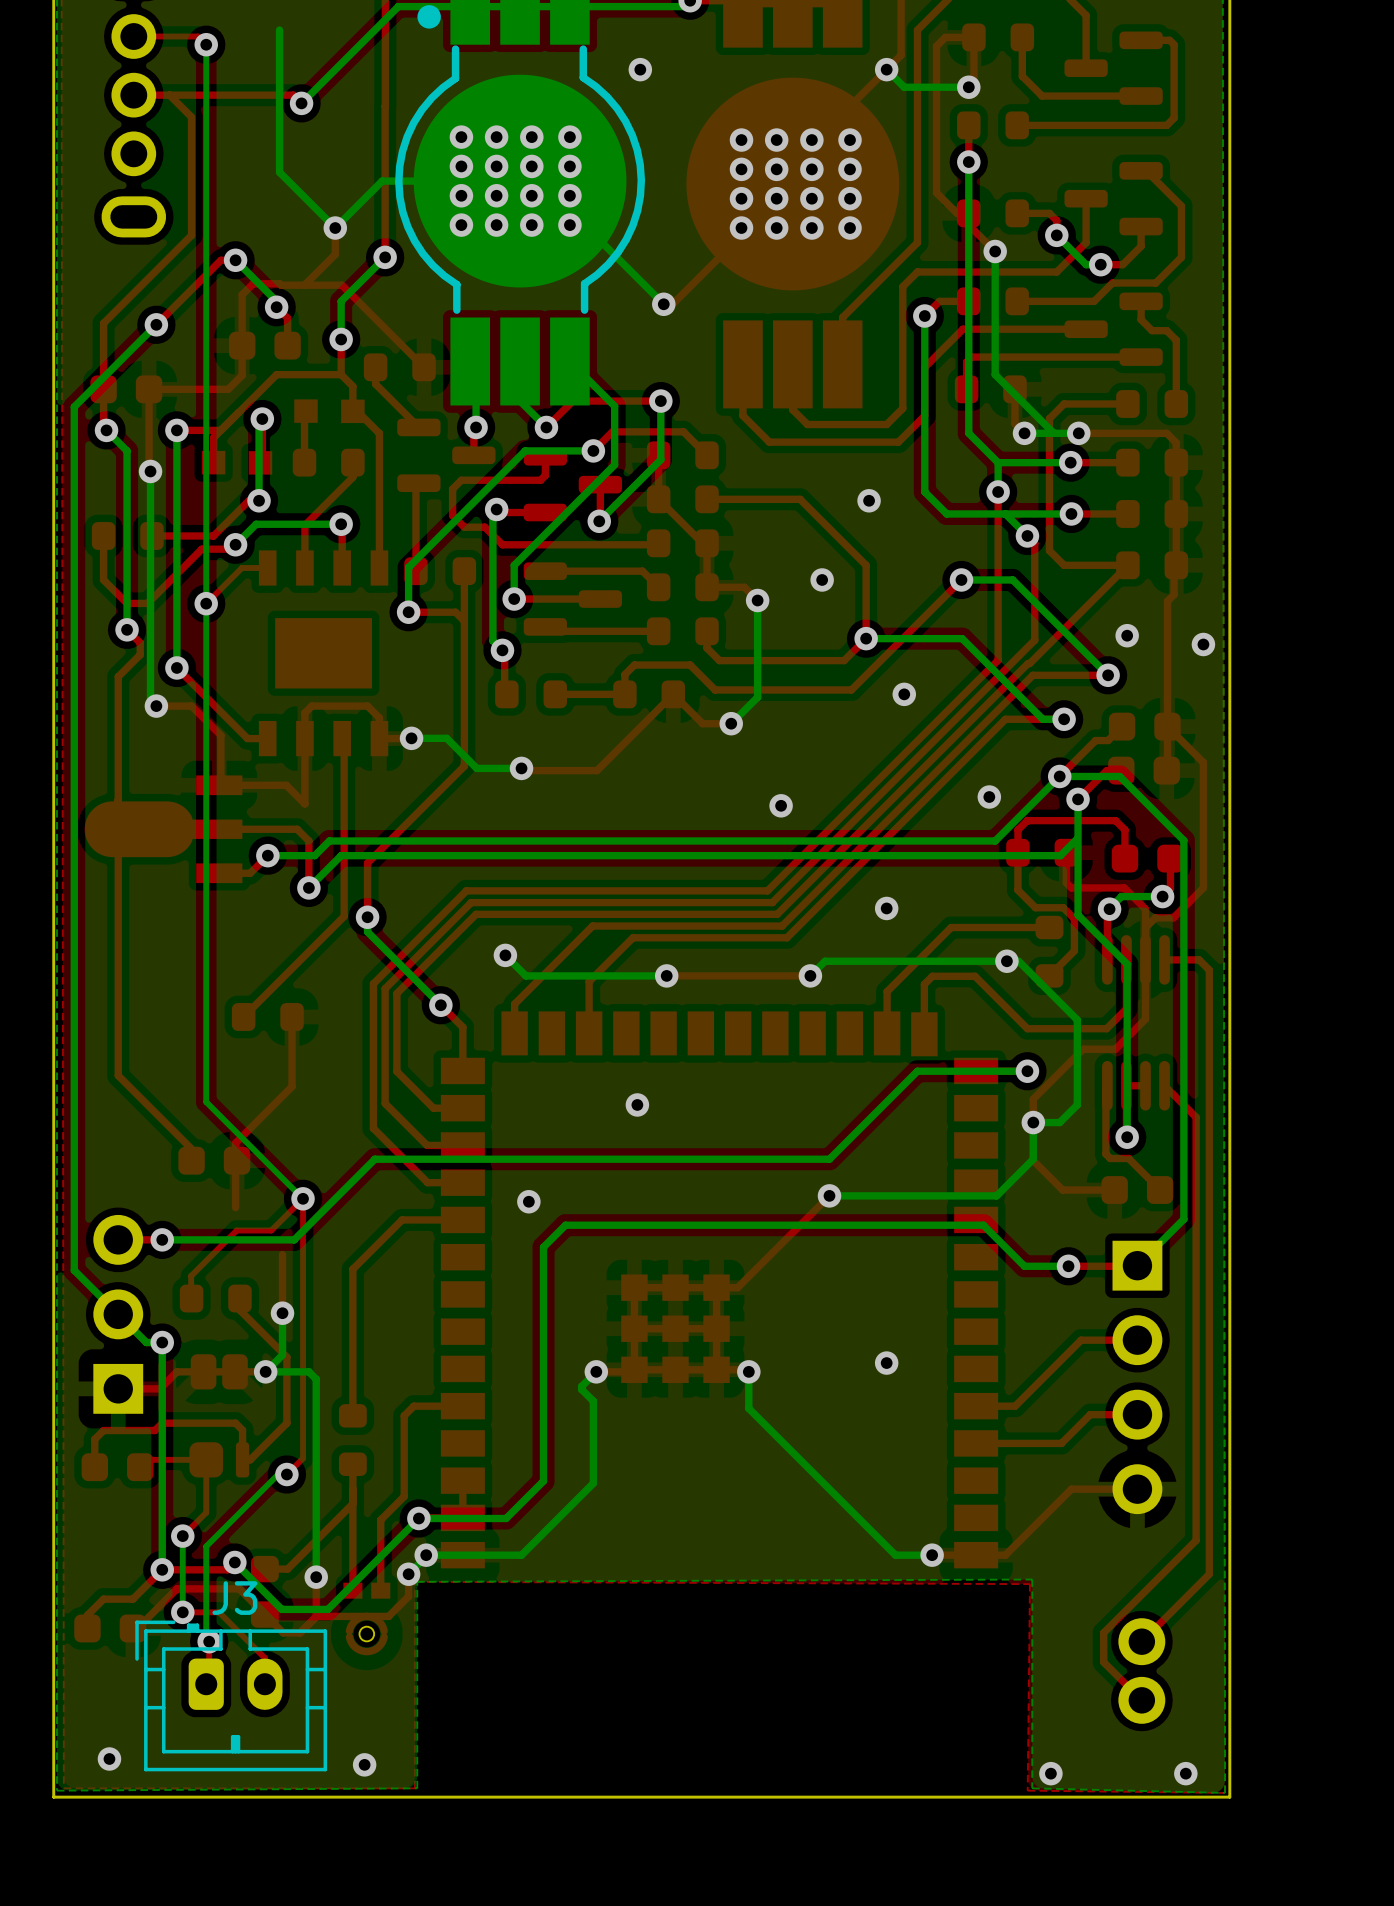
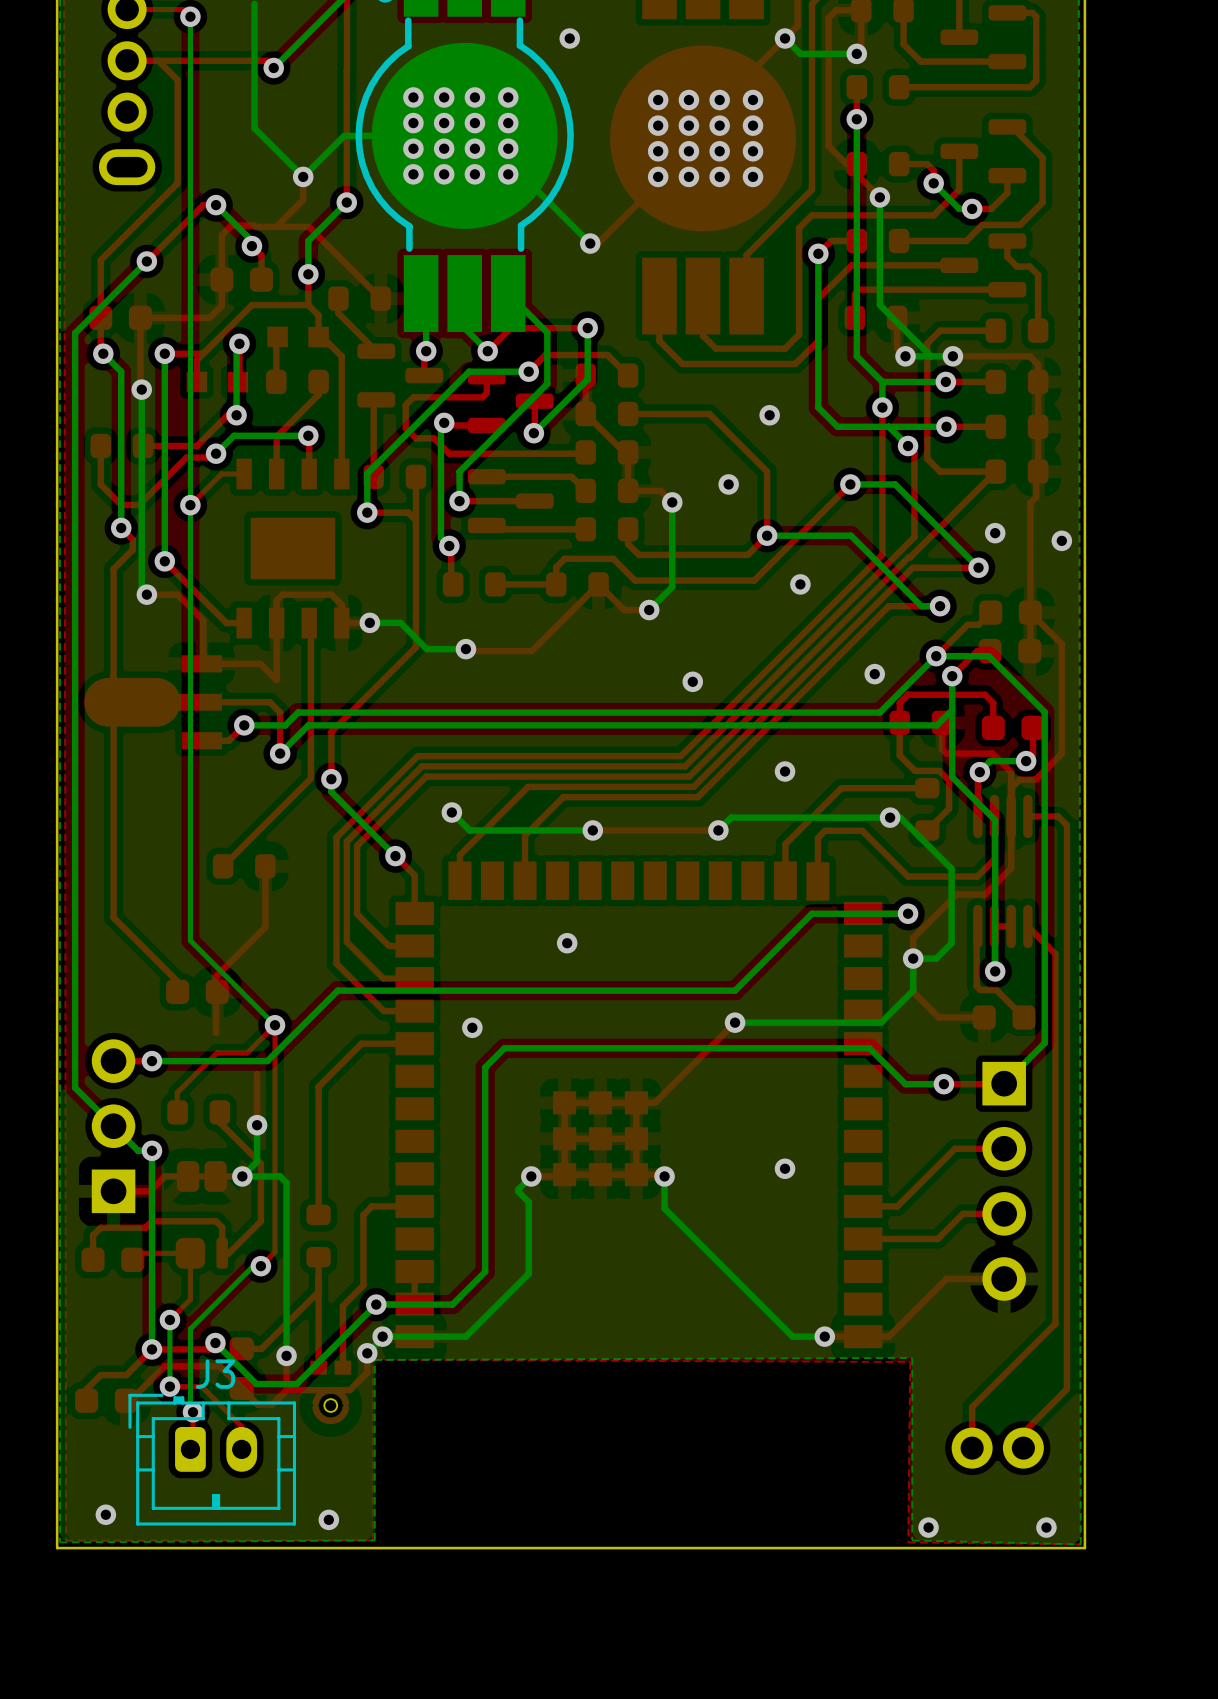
top track: (1209, 1574) (1141, 1641) -> (1066, 1353) (1066, 1389) (1023, 1432) (1023, 1448)
top track: (1103, 1632) (1103, 1662) (1141, 1700) -> (974, 1404) (972, 1407) (972, 1448)
part rotation: 0° (1141, 1671) -> 90° clockwise (997, 1448)

